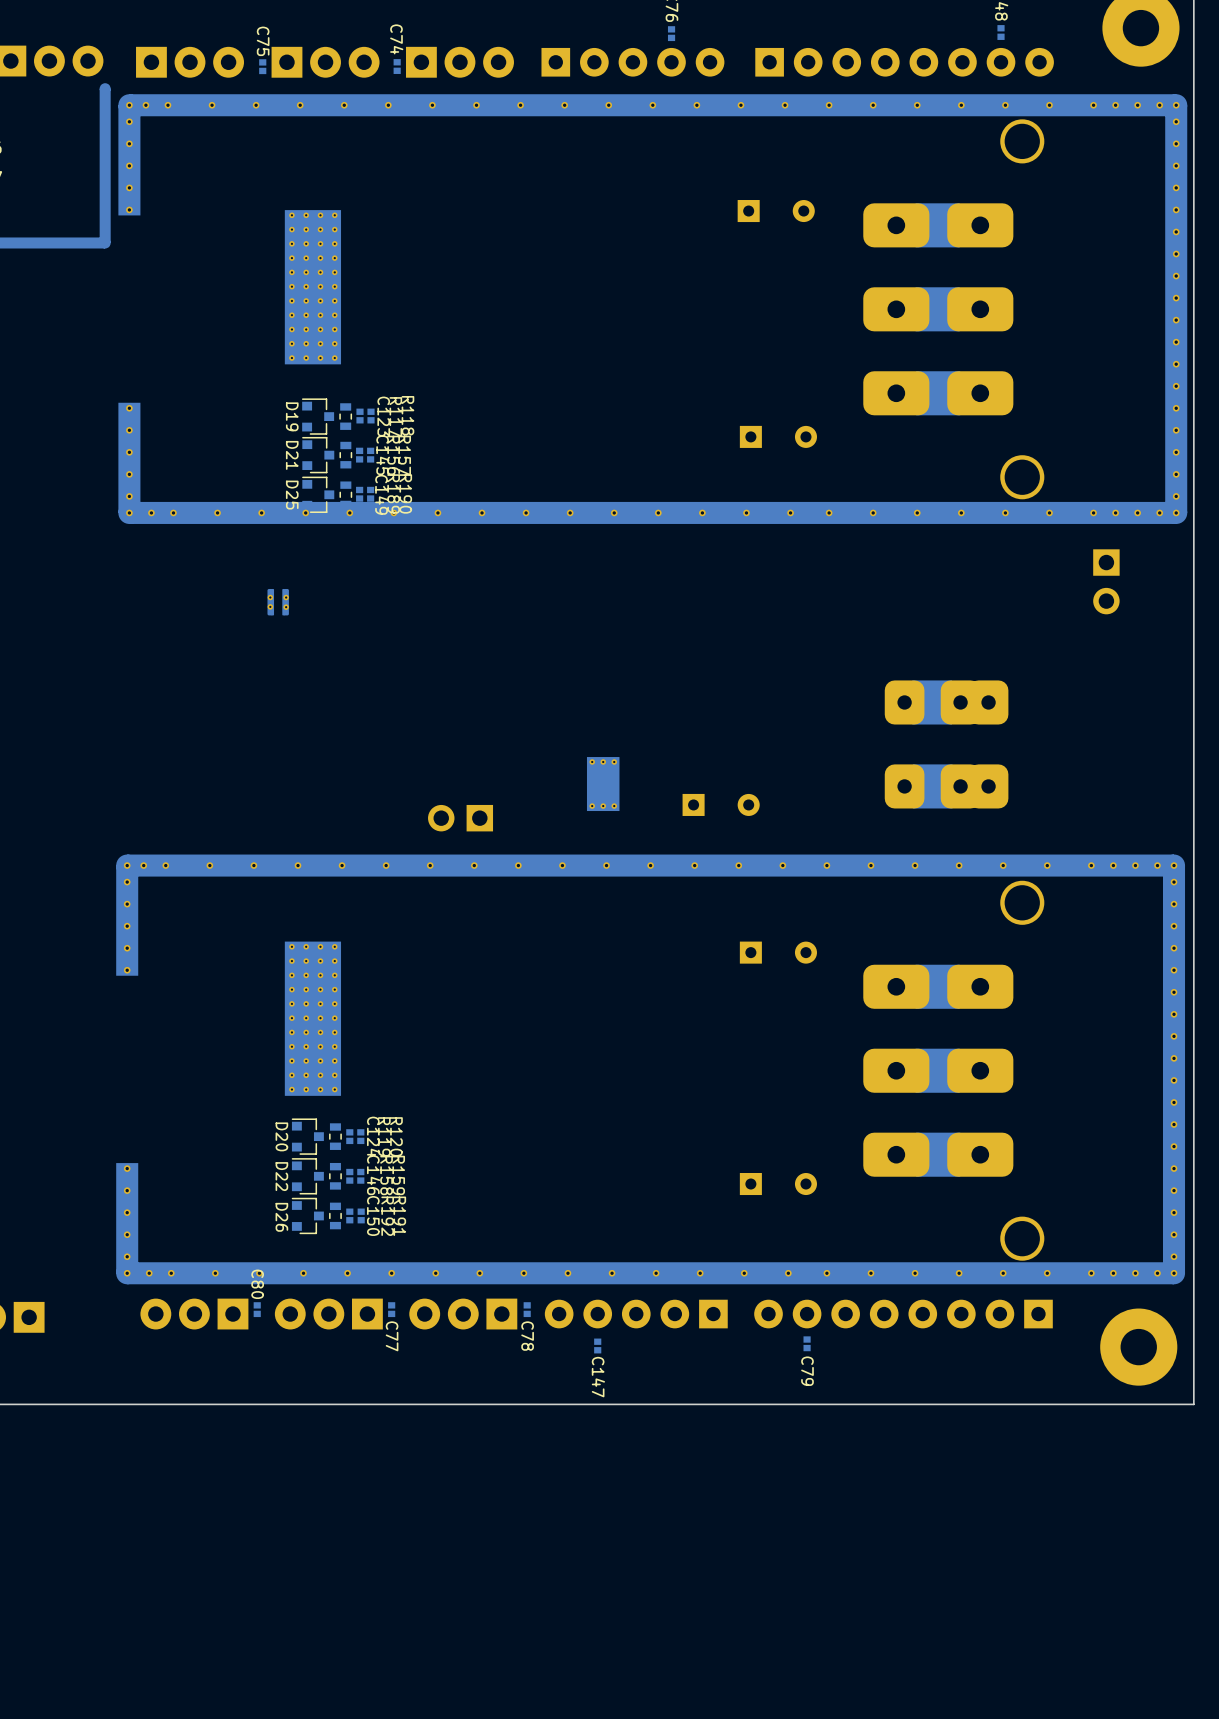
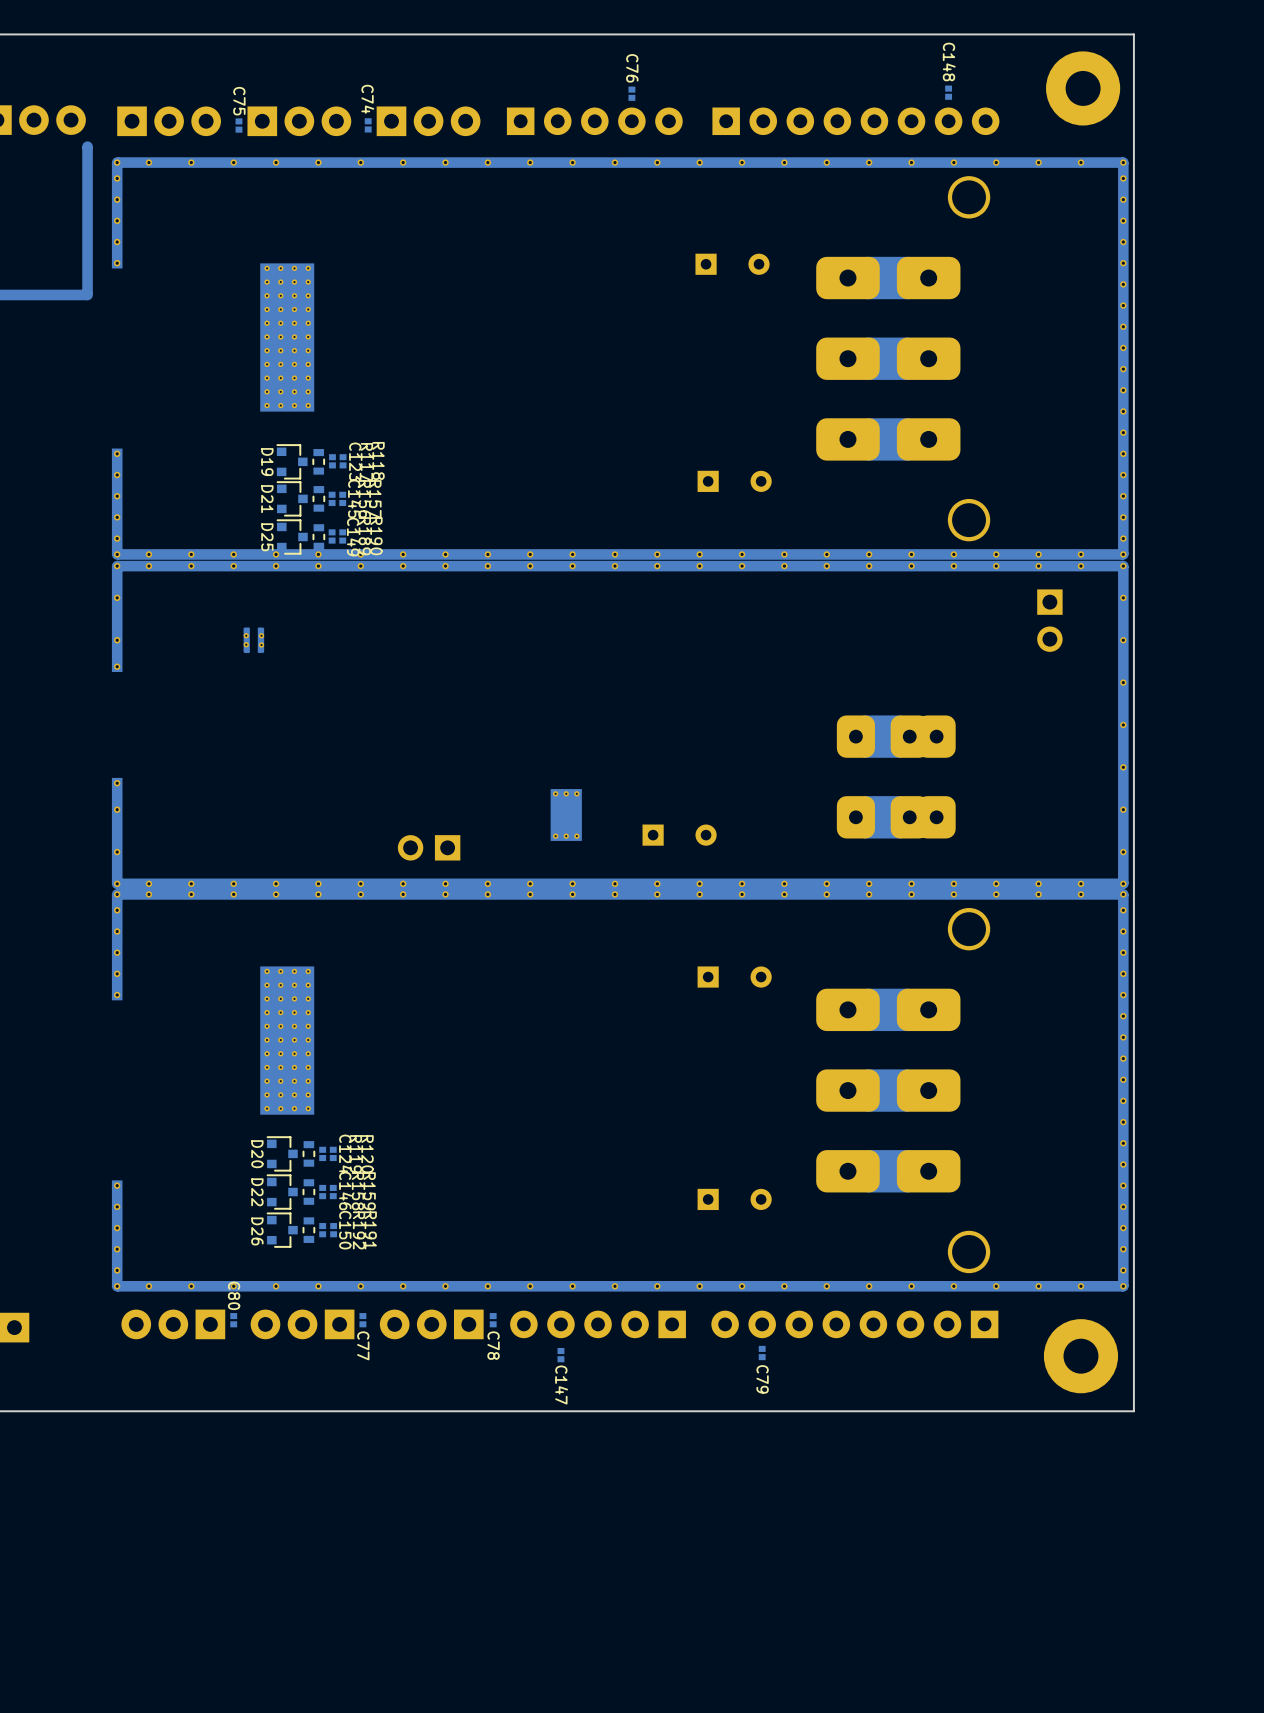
part footprint: [118, 94, 1188, 524] -> [111, 157, 1129, 560]
part: none -> (620, 724)
part footprint: [116, 854, 1186, 1285] -> [111, 889, 1129, 1292]

